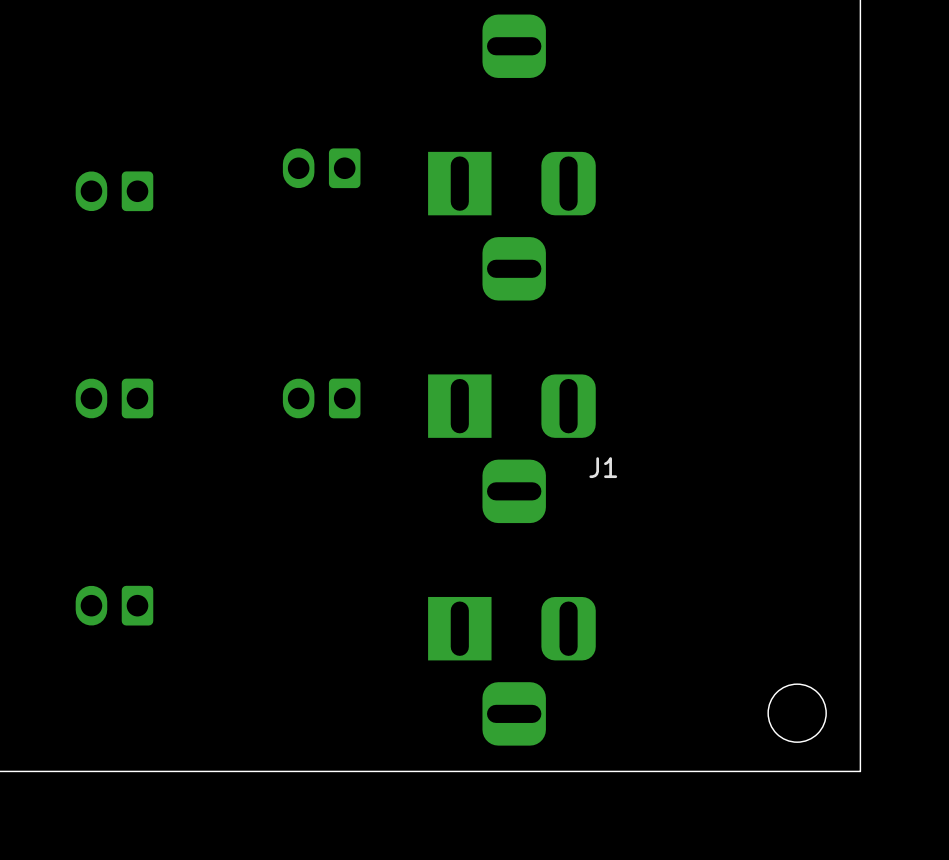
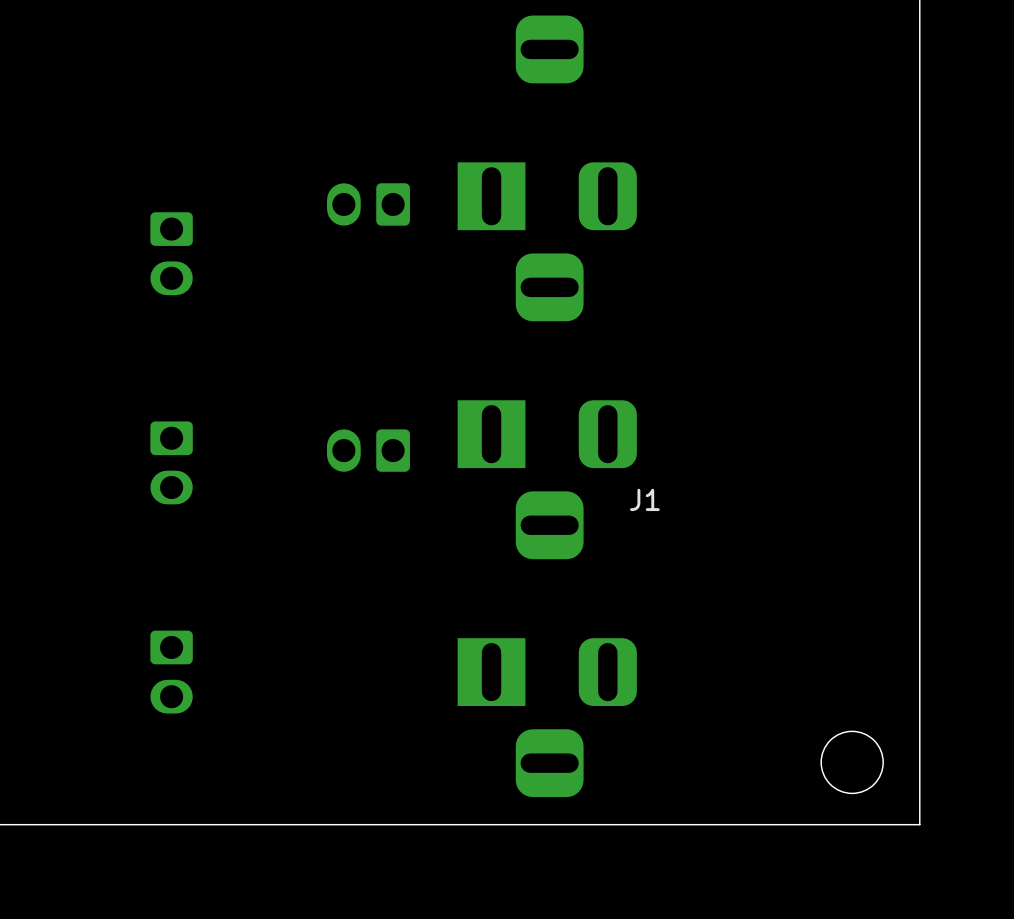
part position: (321, 168) -> (368, 204)
part rotation: 0° (114, 191) -> 90° counterclockwise (171, 253)
part position: (114, 191) -> (171, 253)
part rotation: 0° (114, 398) -> 90° counterclockwise (171, 462)
part position: (114, 398) -> (171, 462)
part position: (321, 398) -> (368, 450)
part rotation: 0° (114, 605) -> 90° counterclockwise (171, 672)
part position: (114, 605) -> (171, 672)

